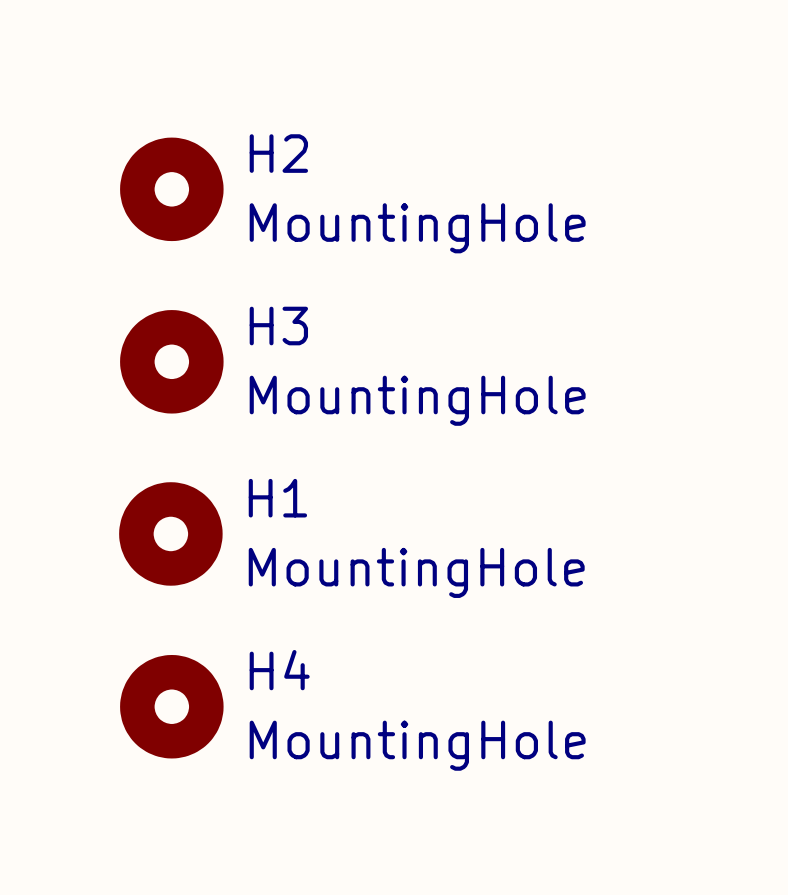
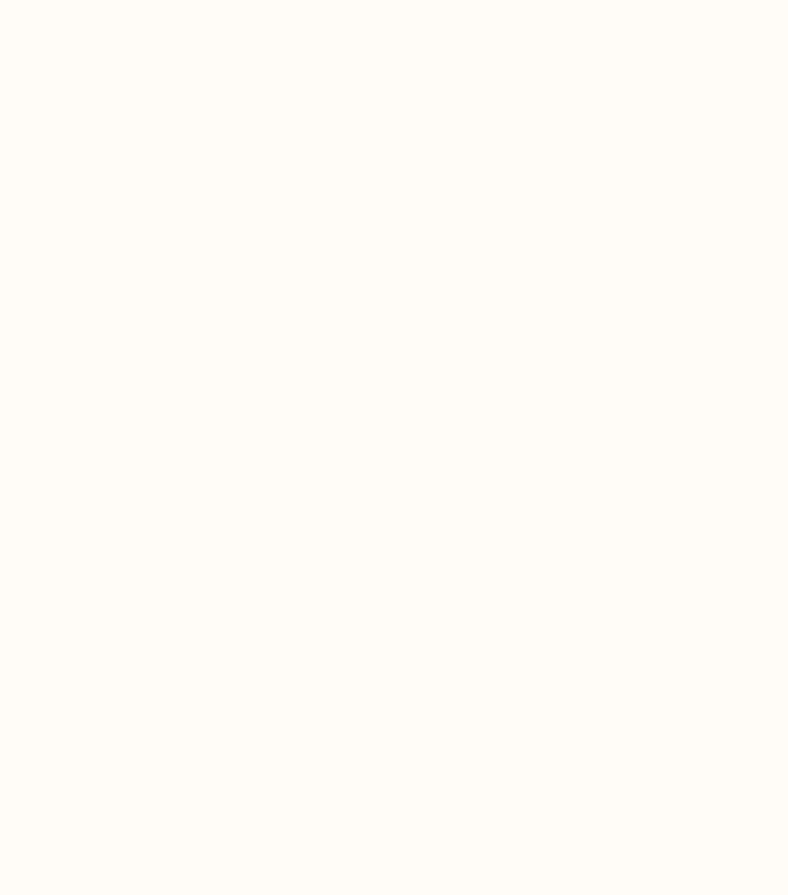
H2: MountingHole (171, 189) -> none
H3: MountingHole (171, 361) -> none
H1: MountingHole (170, 533) -> none
H4: MountingHole (171, 706) -> none

